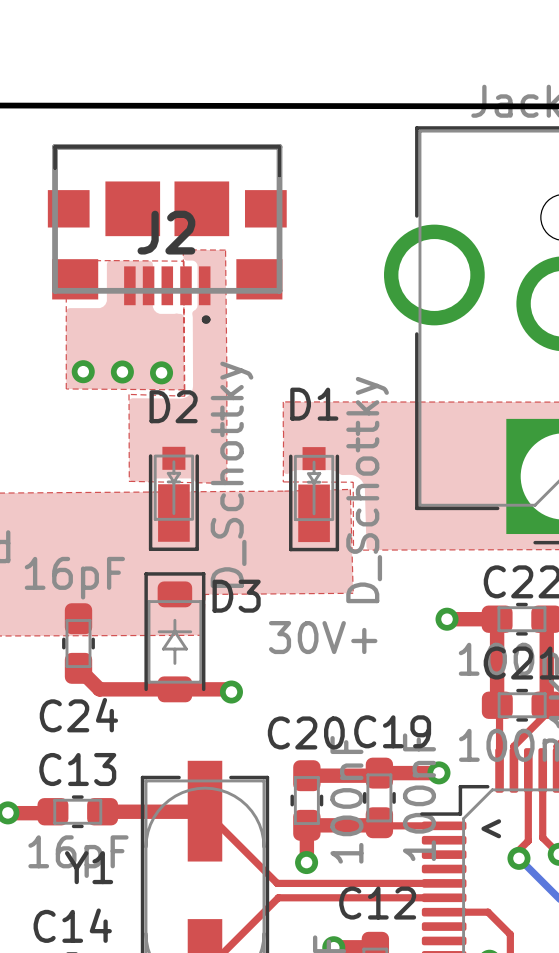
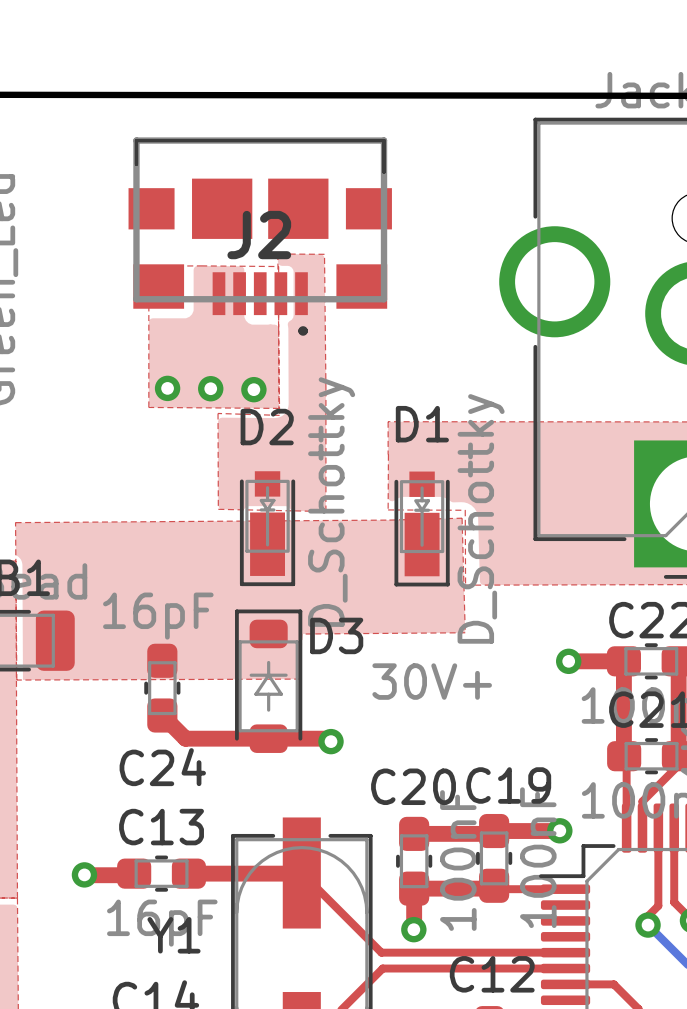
text: < (491, 828) -> none

